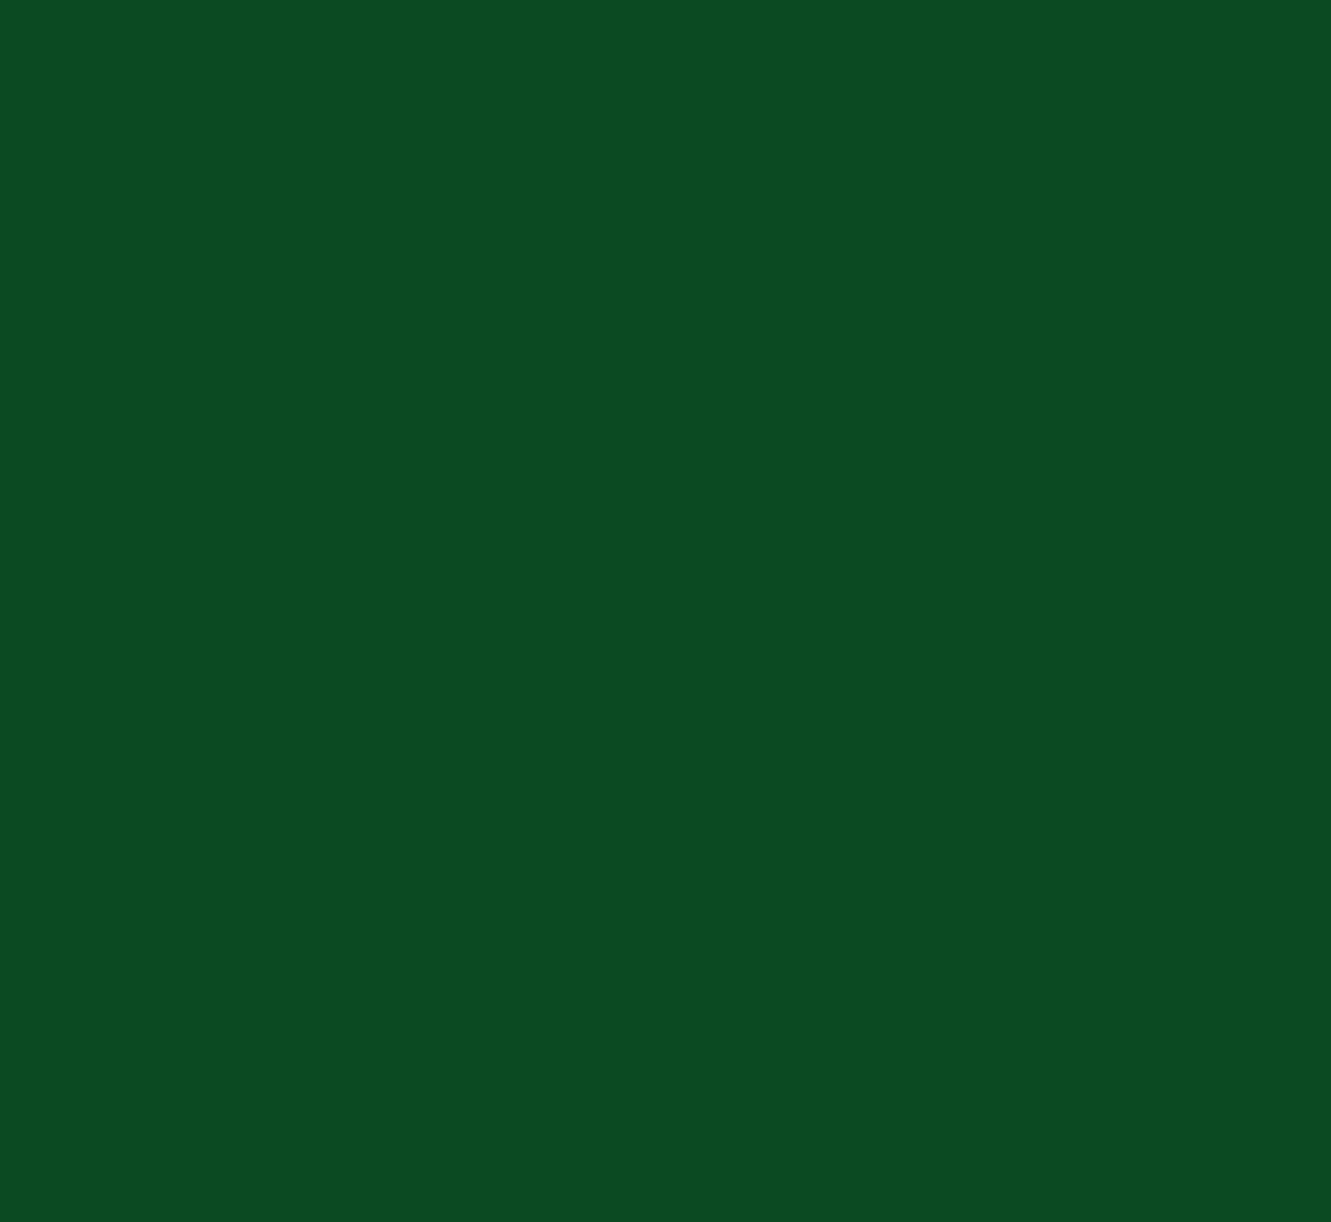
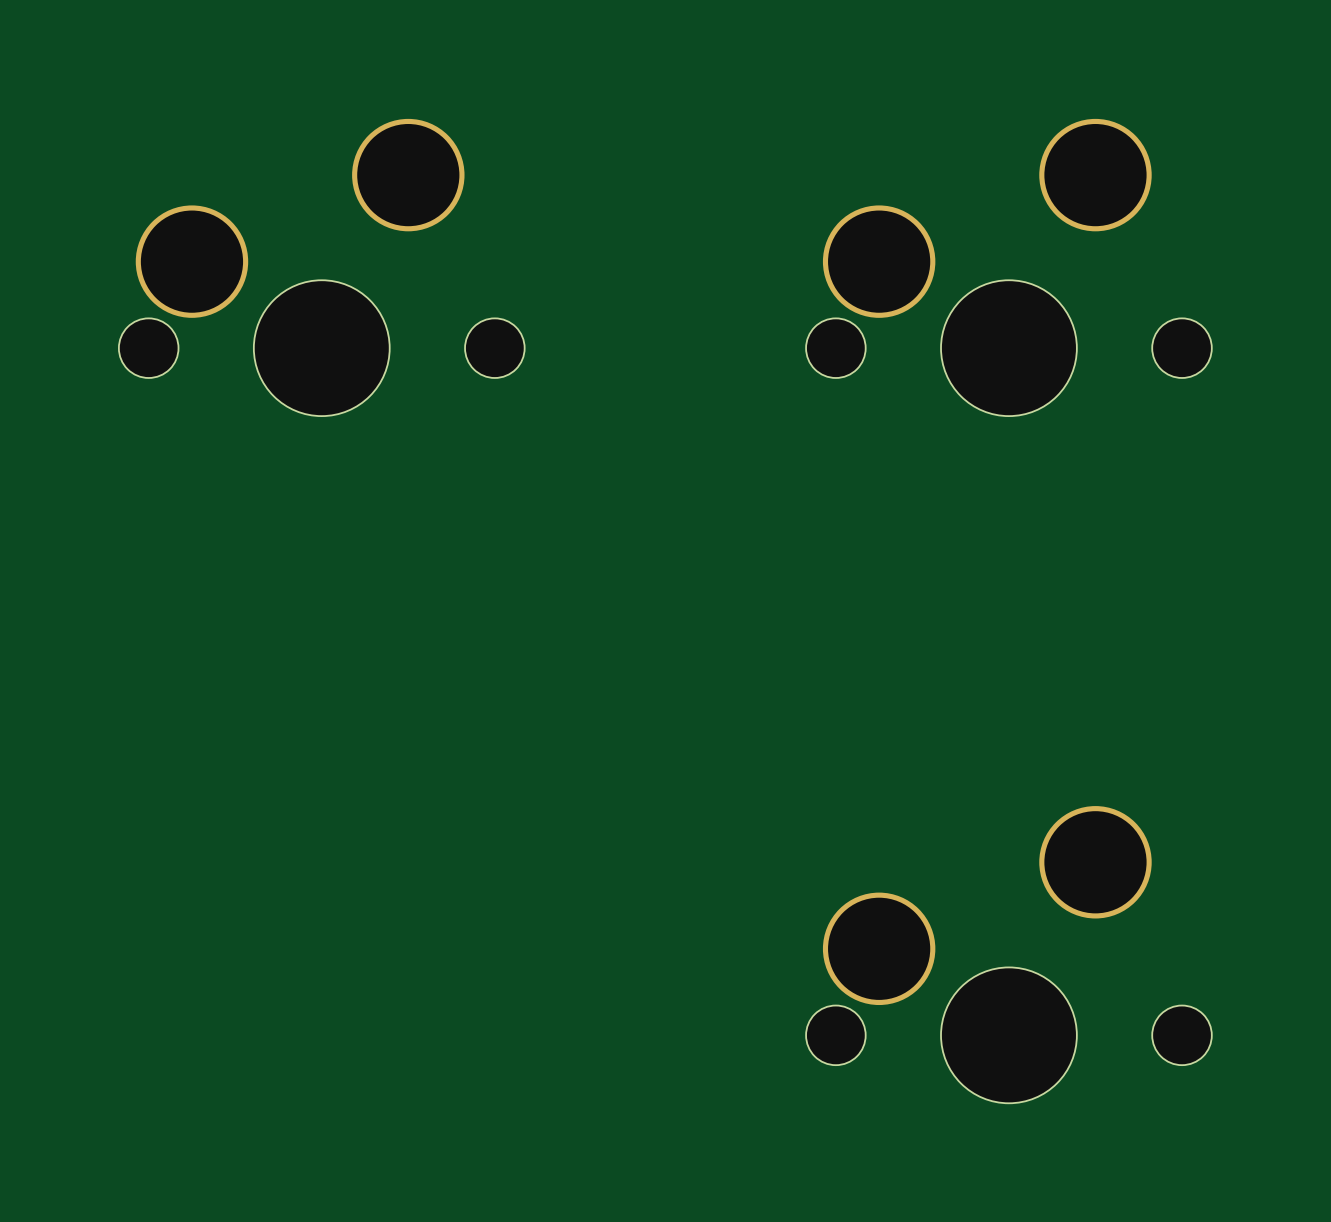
part: none -> (321, 267)
part: none -> (1008, 267)
part: none -> (1008, 954)

